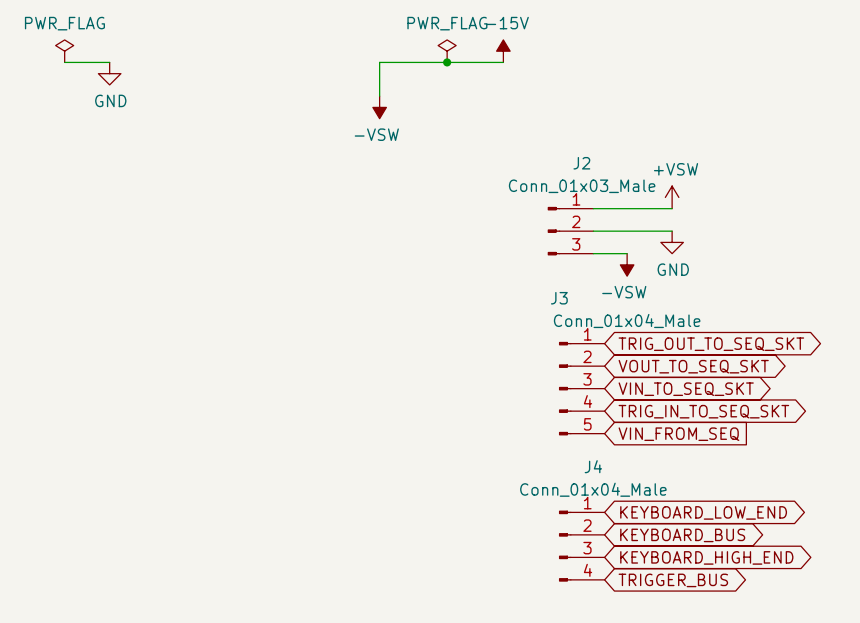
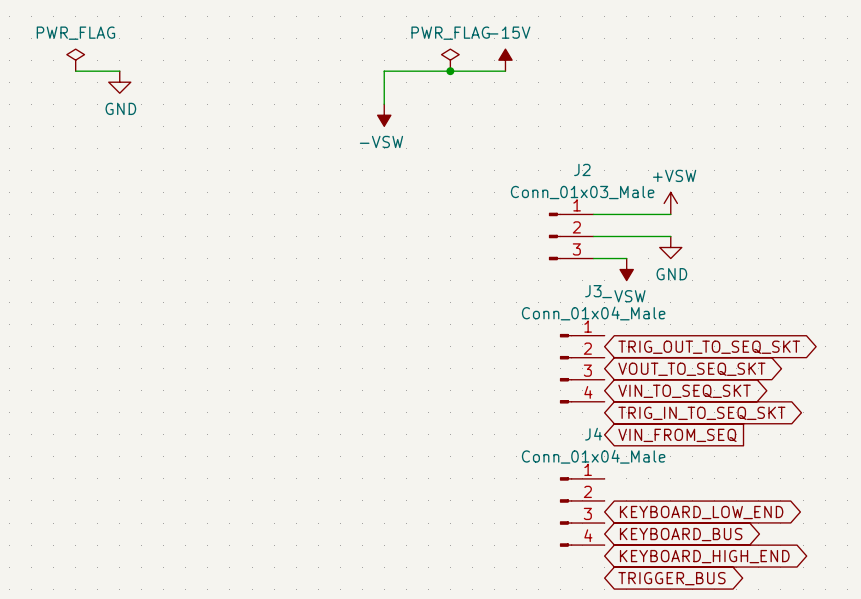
J3 name position: J3 (559, 298) -> J3 (593, 291)
J3 value position: Conn_01x04_Male (627, 321) -> Conn_01x04_Male (593, 313)
J3 symbol: [558, 341, 605, 436] -> [559, 333, 605, 404]
J4 position: (581, 546) -> (582, 511)

